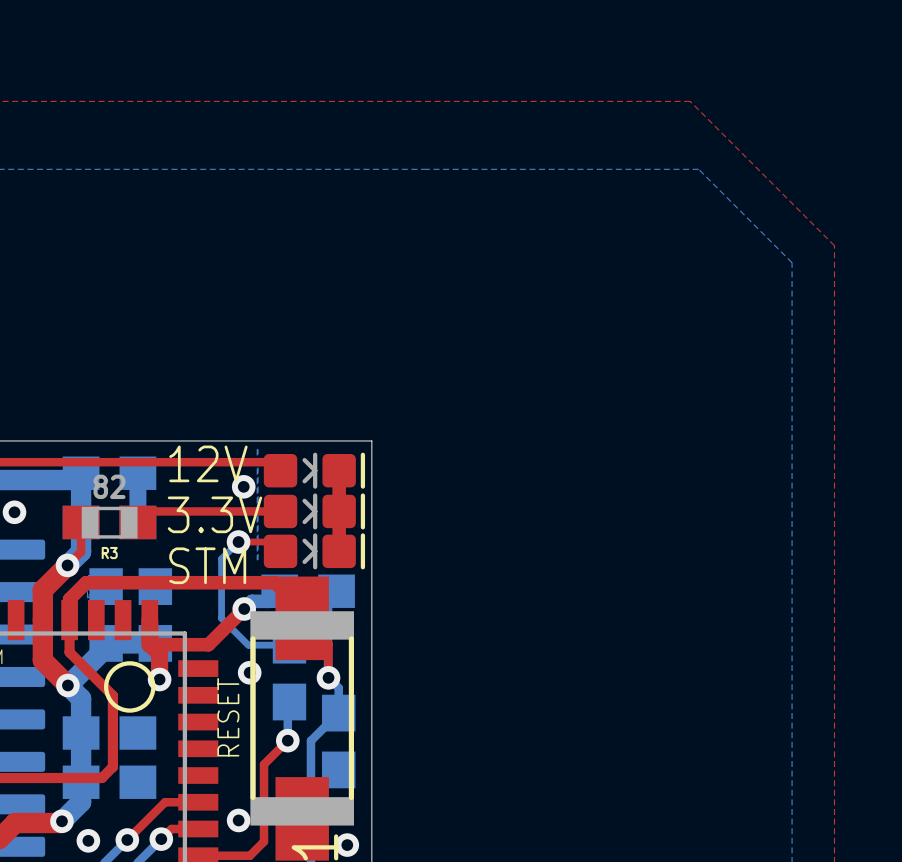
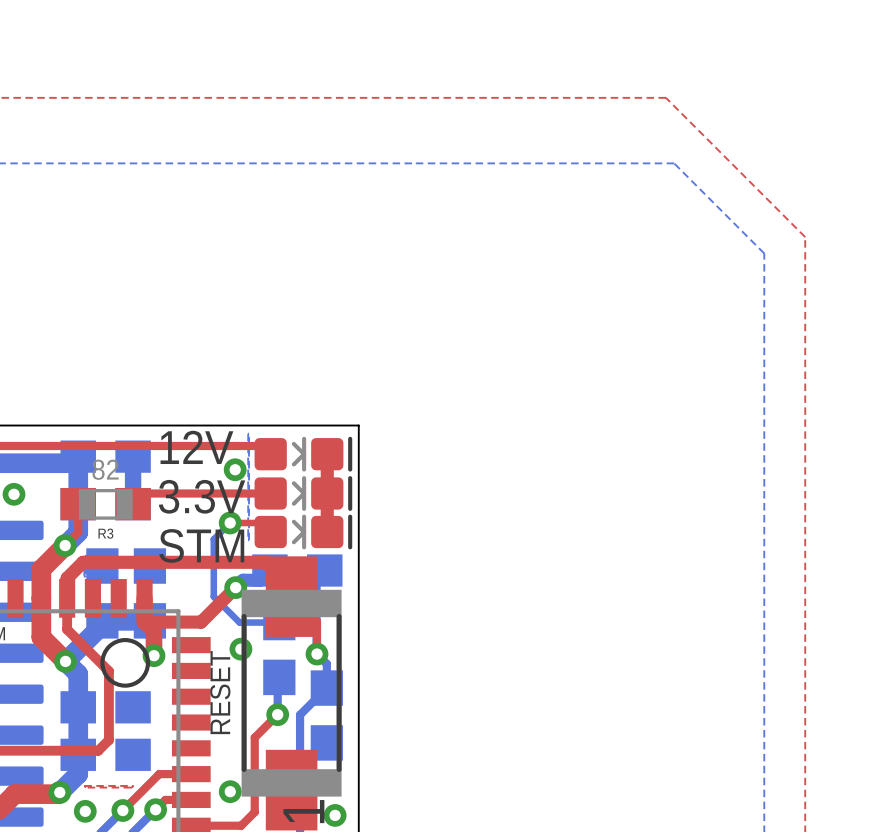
top zone outline: none -> (84, 785) (133, 785) (131, 787) (86, 787) (84, 785)

